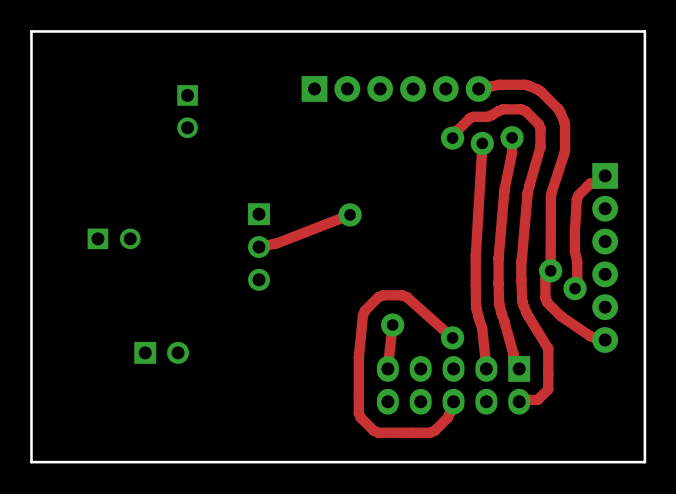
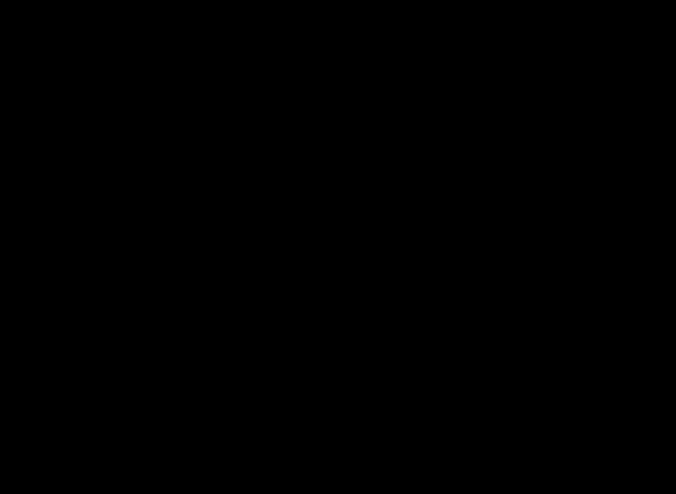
board edge: (31, 31) (644, 31) (644, 462) (31, 462) (31, 31) -> none
part: (396, 88) -> none
track: (478, 88) (499, 84) (528, 85) (540, 91) (560, 112) (565, 125) (565, 150) (550, 195) (550, 270) (545, 279) (545, 298) (547, 302) (560, 316) (590, 335) (605, 340) -> none
part: (187, 111) -> none
track: (512, 137) (512, 152) (504, 191) (498, 258) (499, 303) (513, 353) (513, 361) (519, 368) -> none
via: (512, 137) -> none
track: (452, 138) (469, 118) (487, 116) (502, 109) (525, 111) (540, 128) (540, 146) (527, 193) (521, 280) (523, 304) (548, 348) (548, 389) (537, 399) (519, 399) (519, 401) -> none
via: (452, 138) -> none
track: (482, 143) (475, 255) (476, 305) (482, 328) (486, 368) -> none
via: (482, 143) -> none
track: (605, 175) (597, 183) (590, 183) (576, 199) (574, 251) (577, 279) (575, 288) -> none
track: (350, 214) (277, 243) (259, 247) -> none
via: (350, 214) -> none
part: (114, 238) -> none
part: (259, 247) -> none
part: (605, 257) -> none
via: (550, 270) -> none
via: (575, 288) -> none
track: (392, 325) (387, 368) -> none
via: (392, 325) -> none
track: (452, 337) (407, 297) (402, 295) (383, 295) (378, 297) (364, 310) (362, 315) (358, 357) (358, 413) (360, 417) (373, 430) (378, 432) (430, 432) (434, 430) (447, 417) (453, 401) -> none
via: (452, 337) -> none
part: (161, 352) -> none
part: (453, 385) -> none

